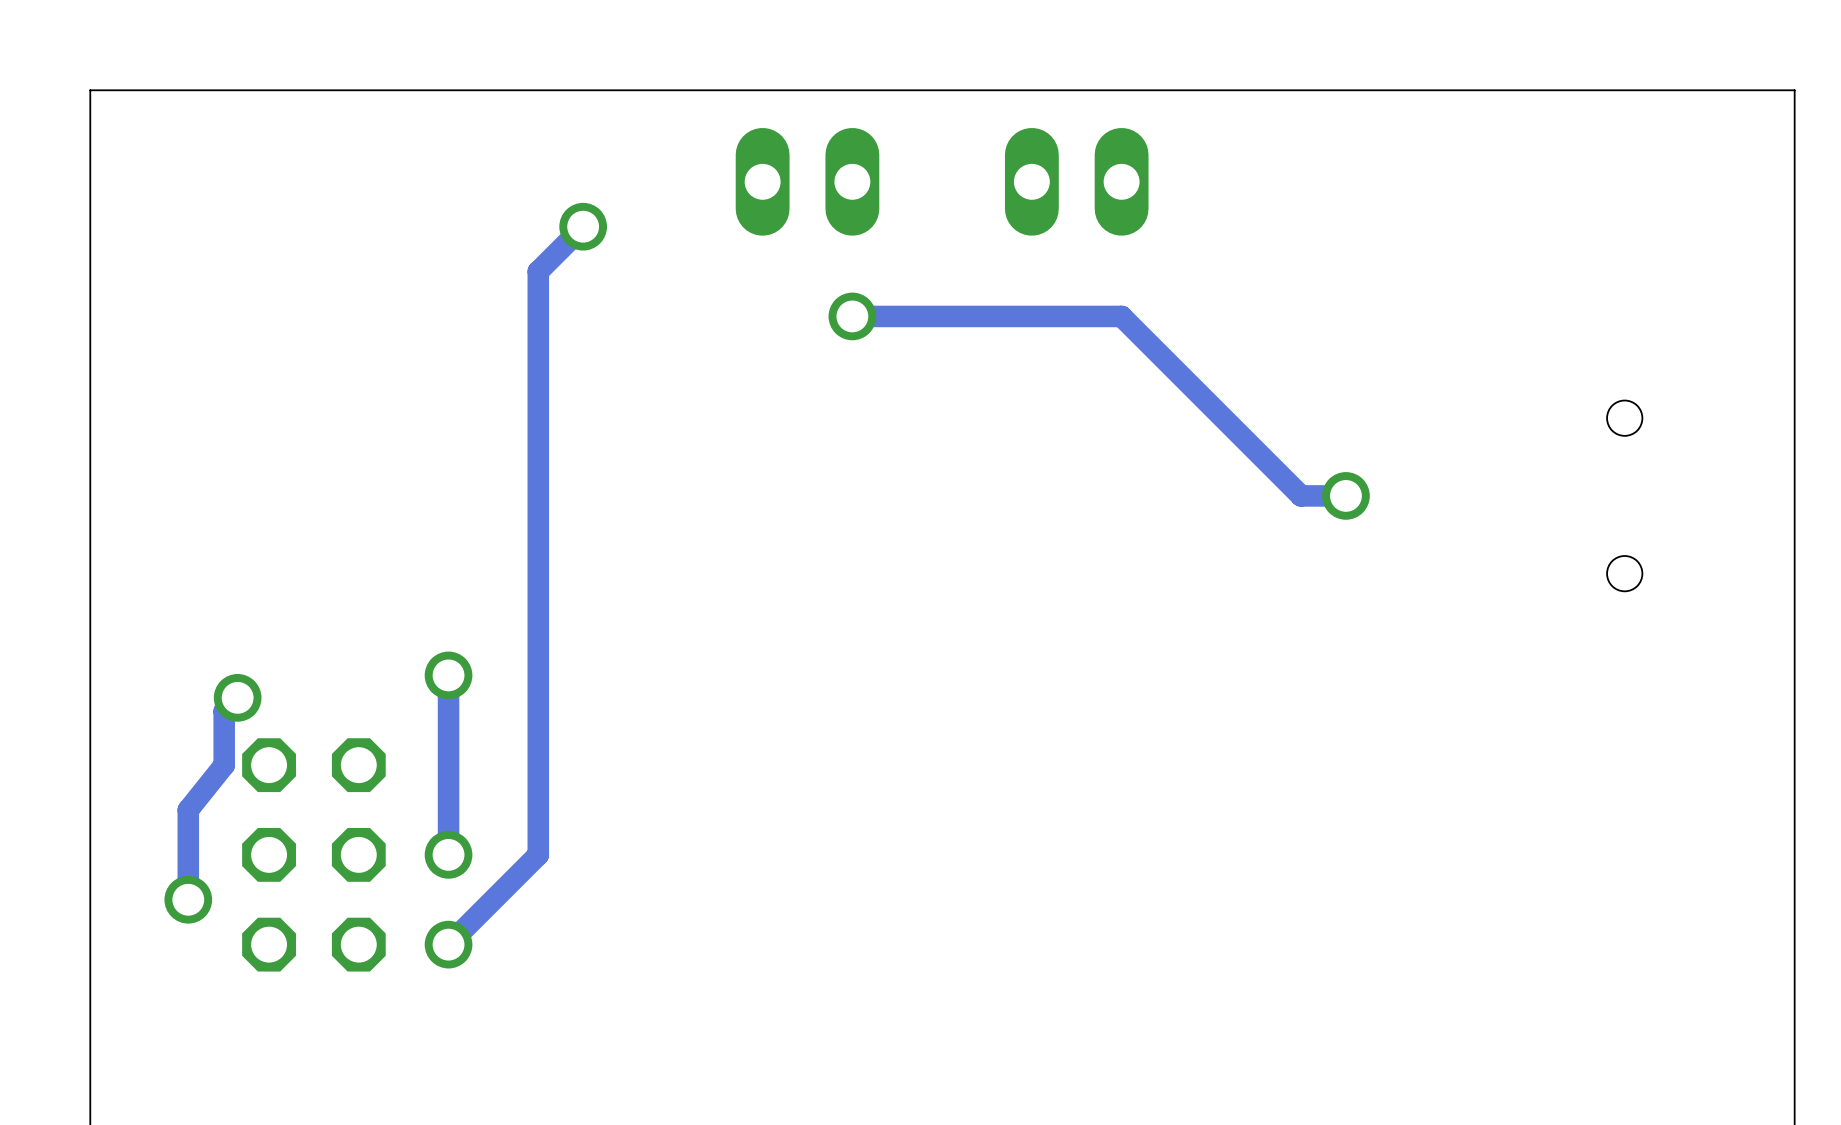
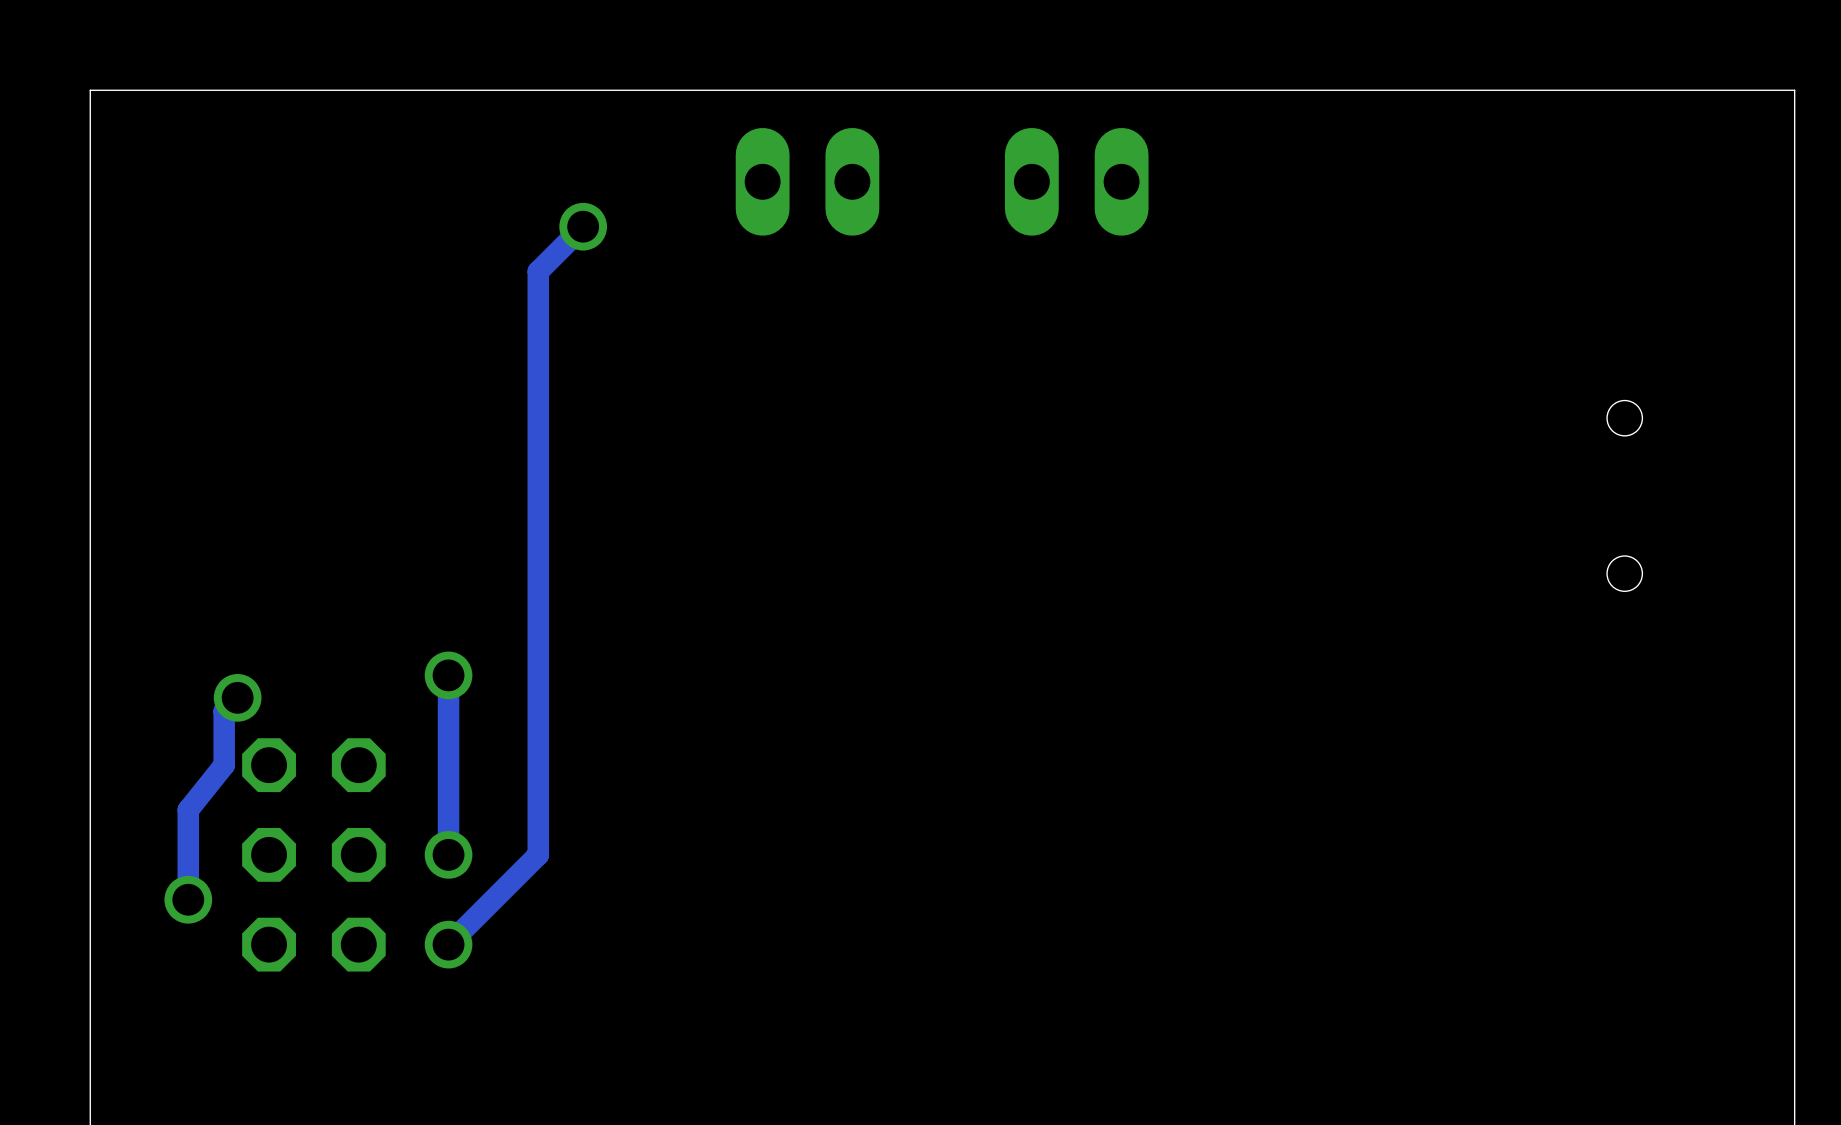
track: (852, 316) (1121, 316) (1301, 495) (1345, 495) -> none
via: (852, 316) -> none
via: (1345, 495) -> none

